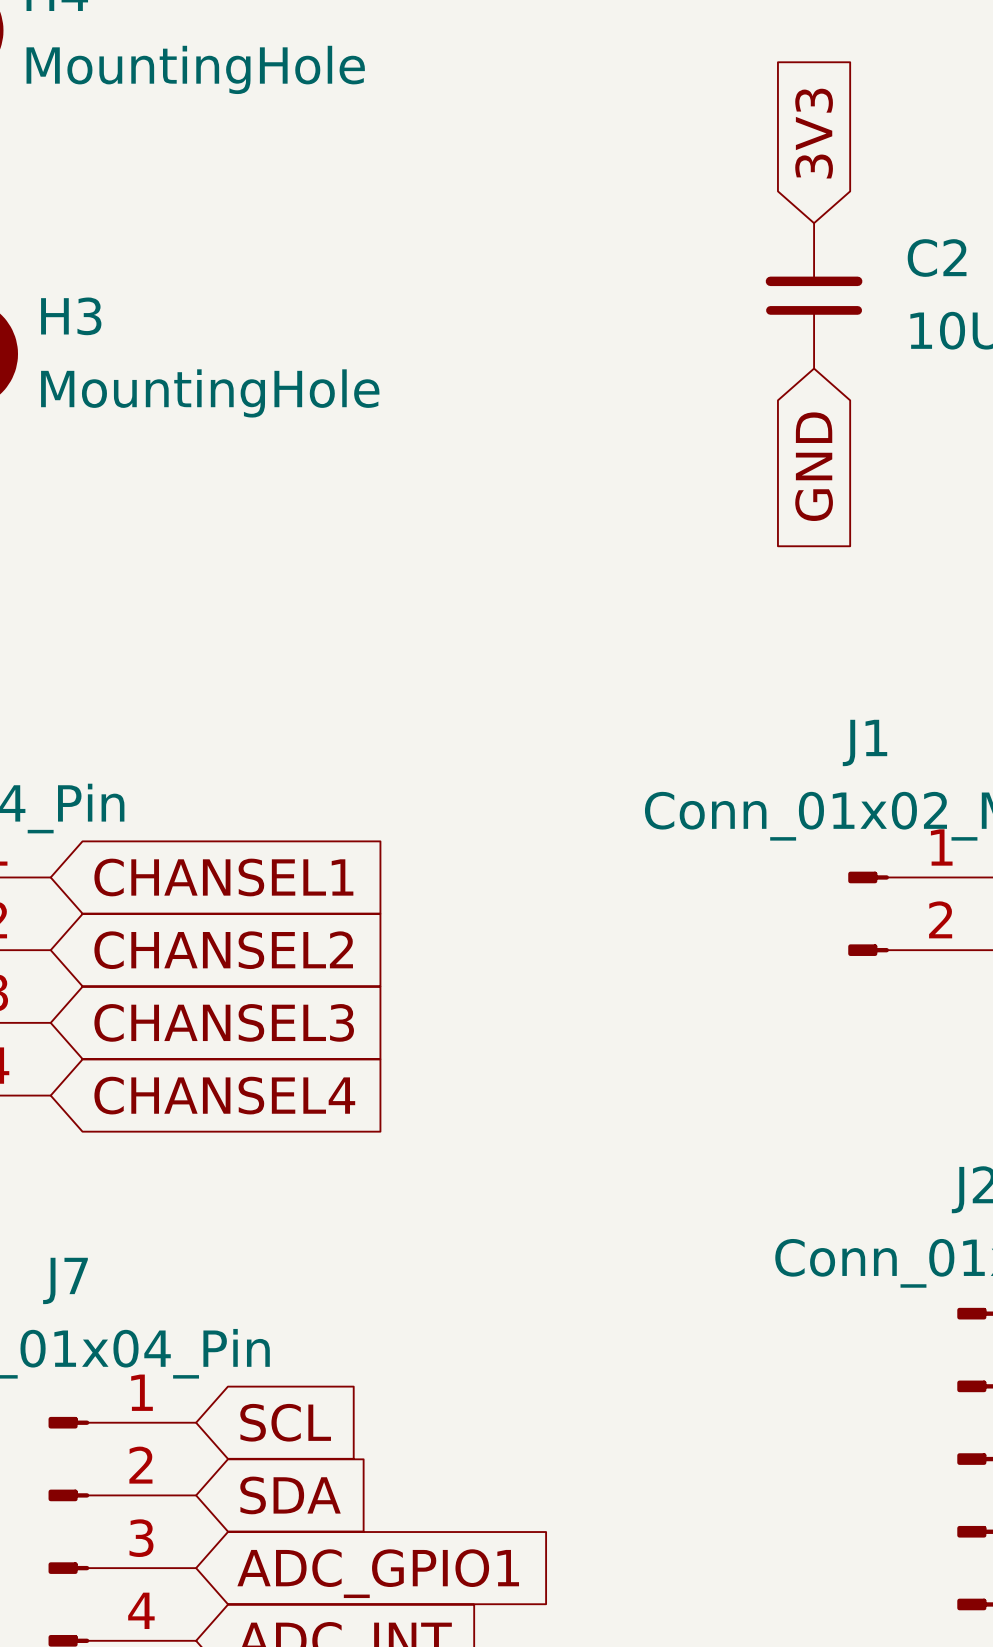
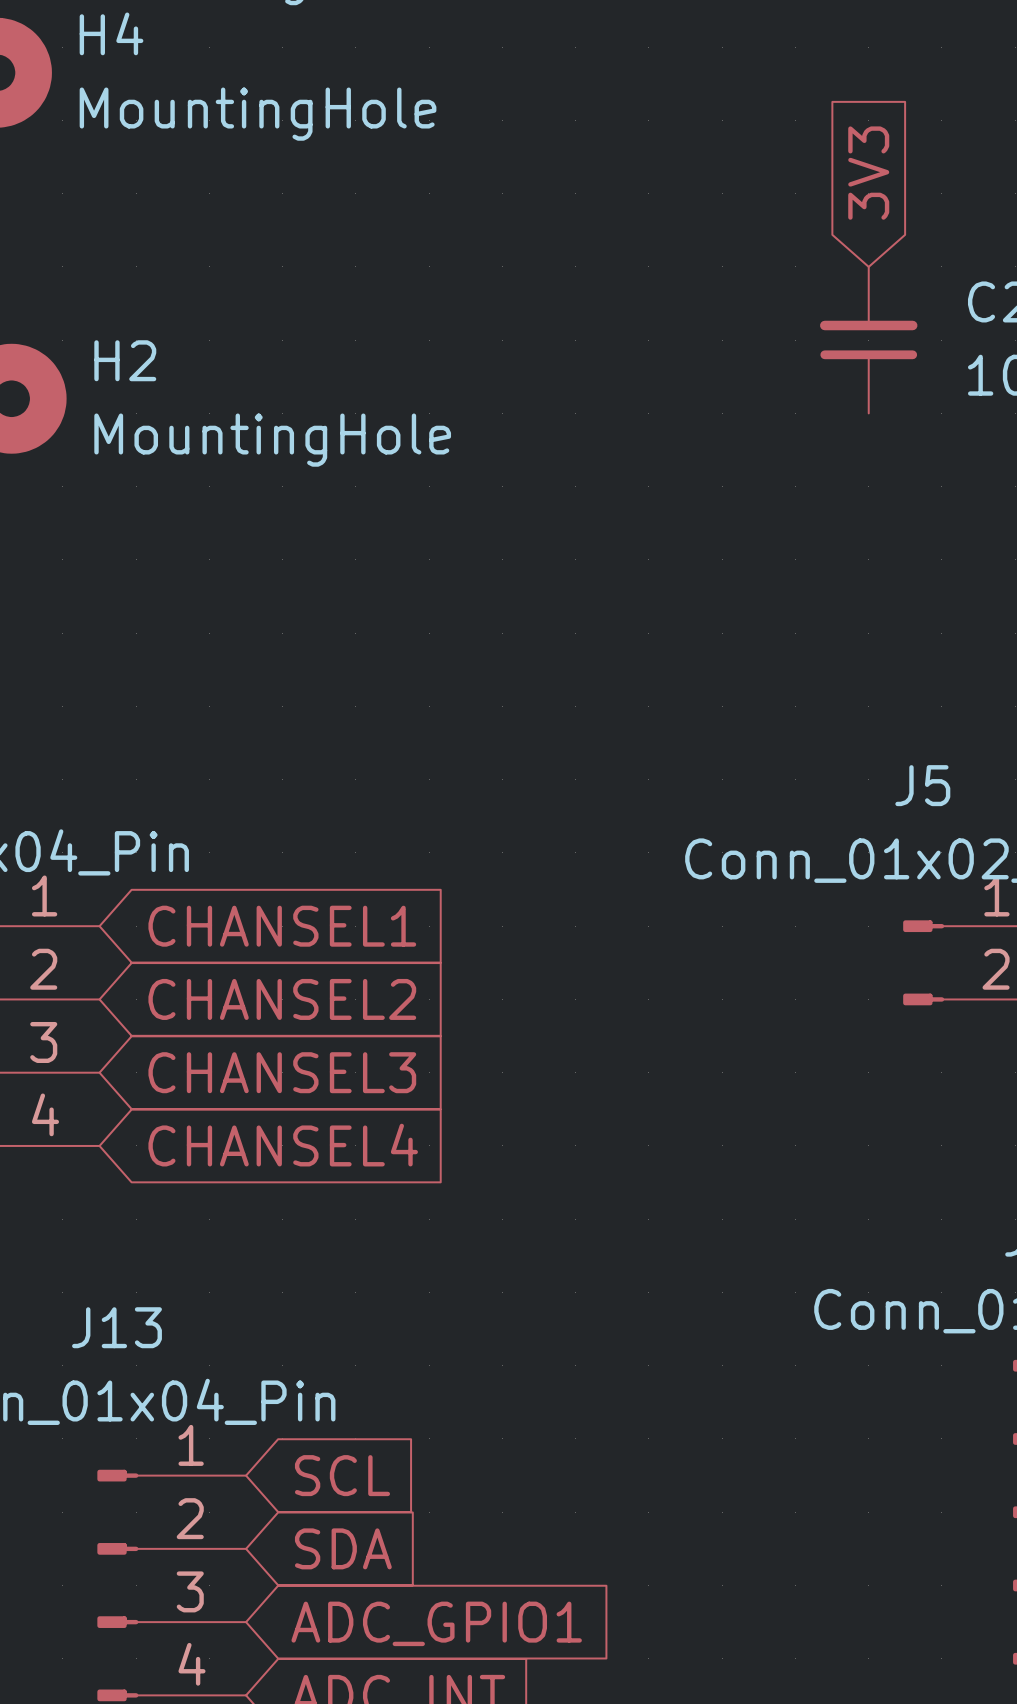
H3 name: H3 (71, 316) -> H2 (125, 360)
global label: GND (814, 466) -> none
J1 name: J1 (865, 742) -> J5 (922, 785)
J7 name: J7 (65, 1280) -> J13 (116, 1327)

